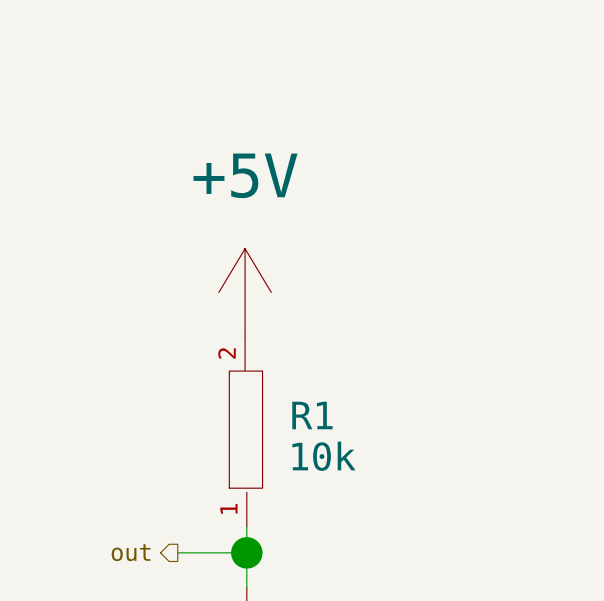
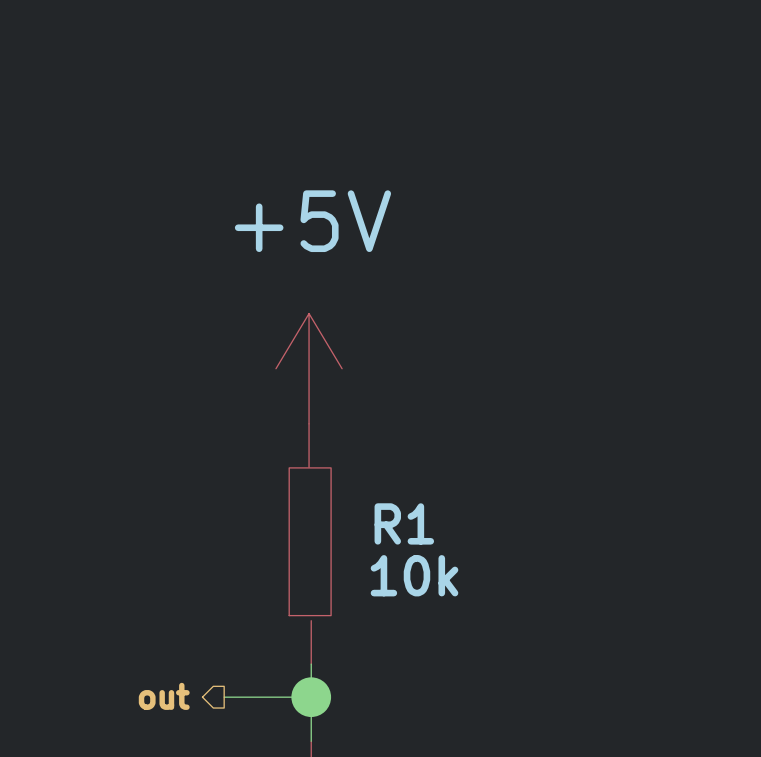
R1 pin number: 2 (227, 353) -> none
R1 pin number: 1 (228, 508) -> none

